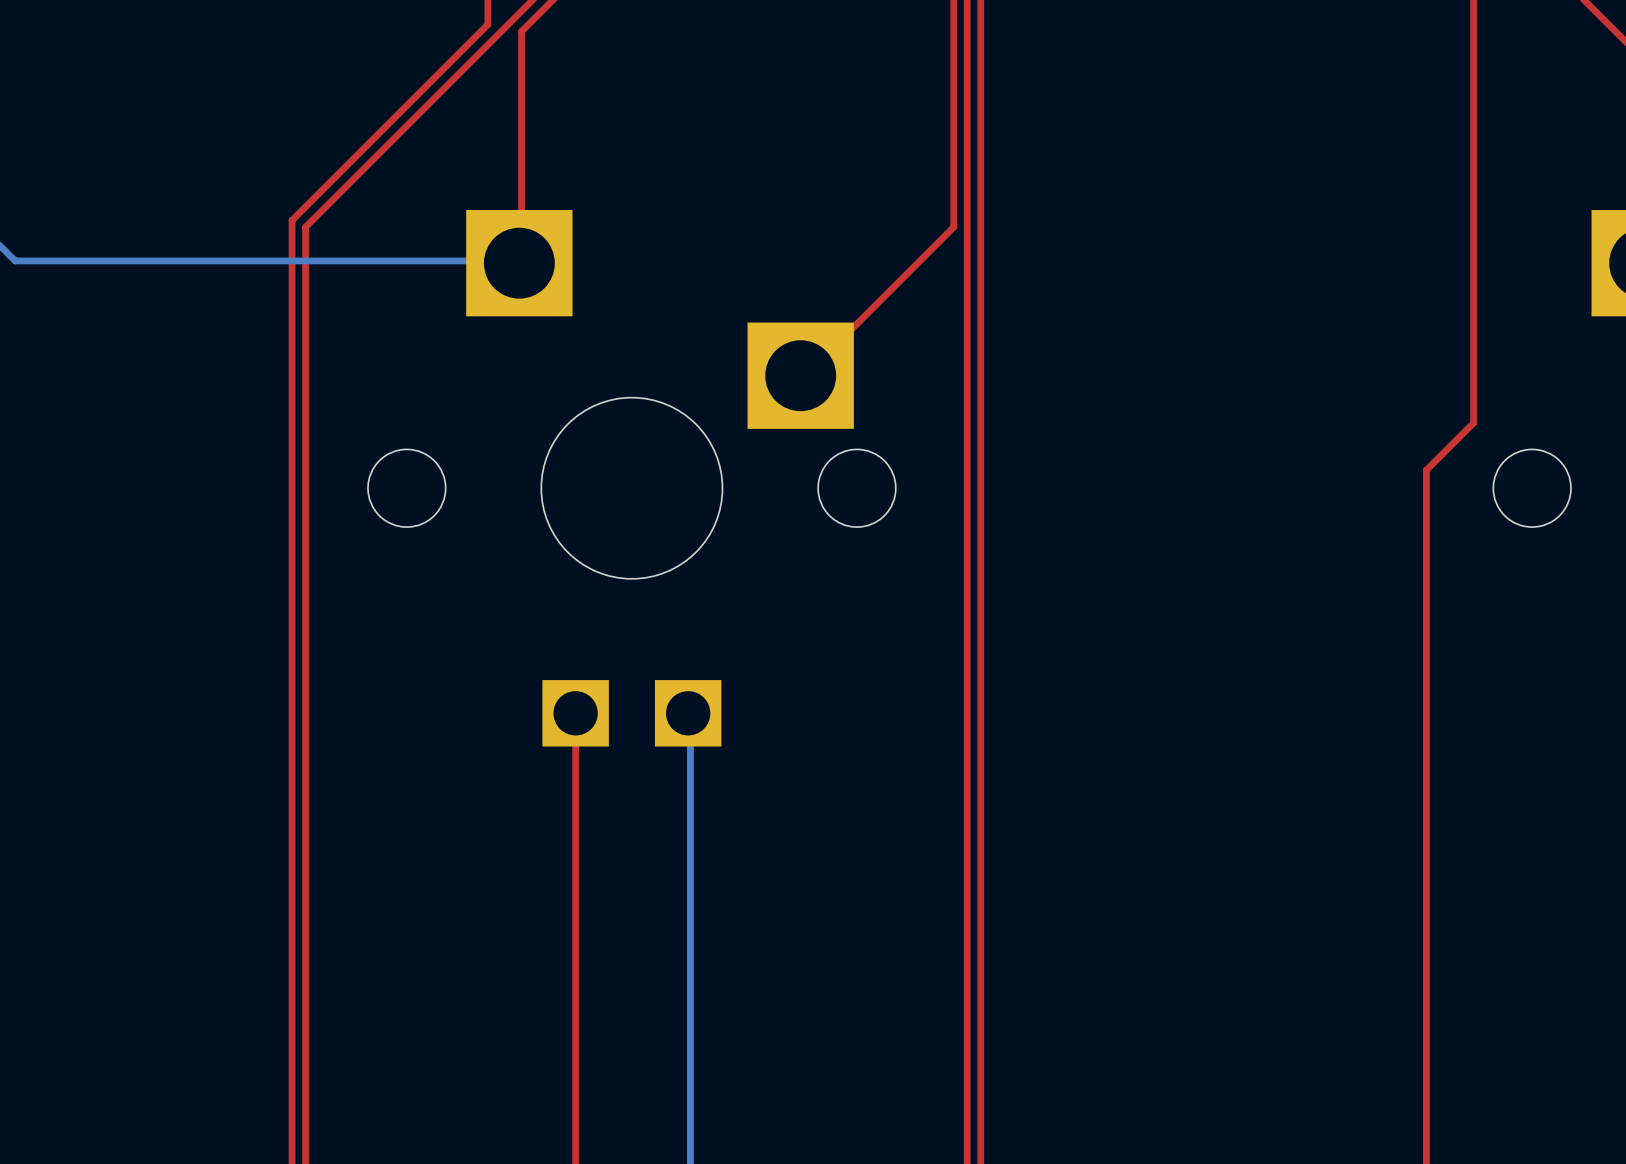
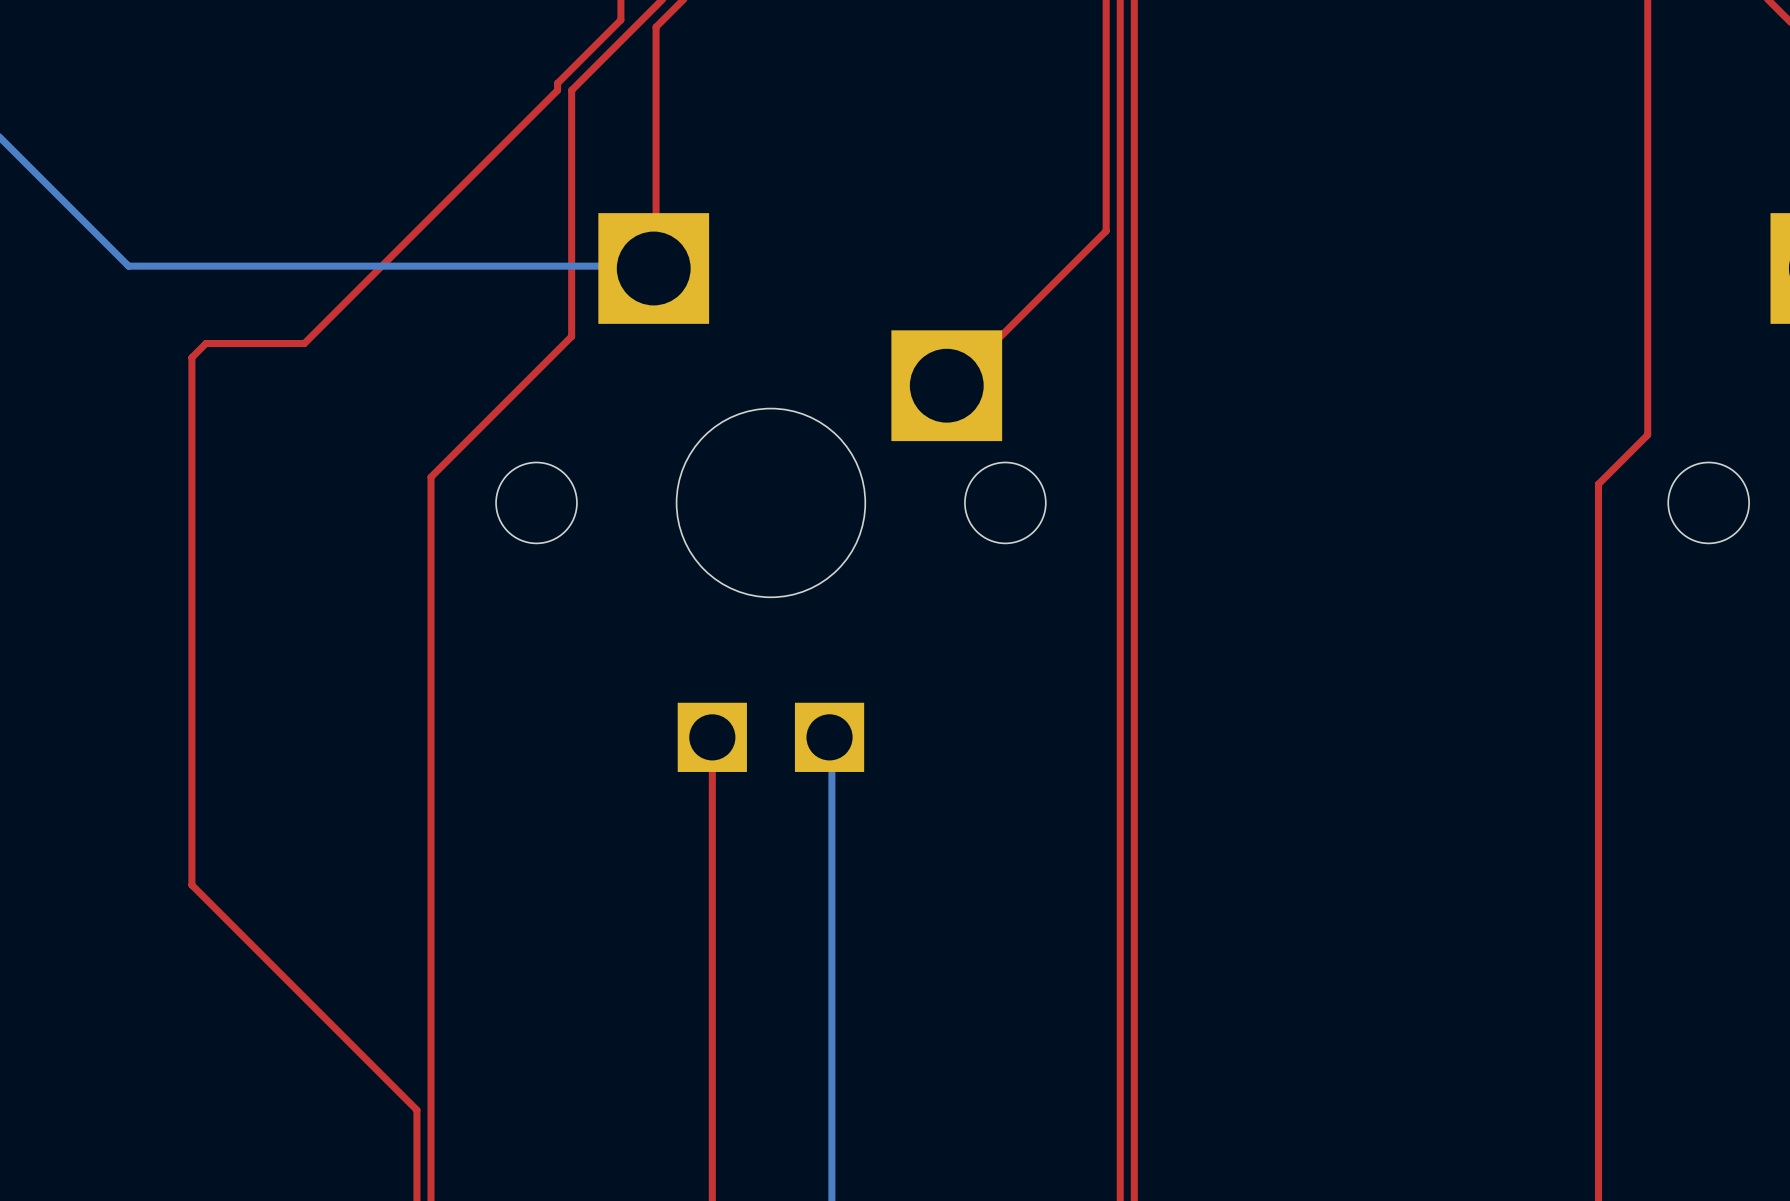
top track: (427, 85) (292, 220) (292, 1071) -> (557, 83) (557, 90) (304, 343) (205, 343) (191, 357) (191, 885) (416, 1110)
top track: (440, 92) (305, 227) (305, 463) -> (571, 90) (571, 336) (431, 477)

